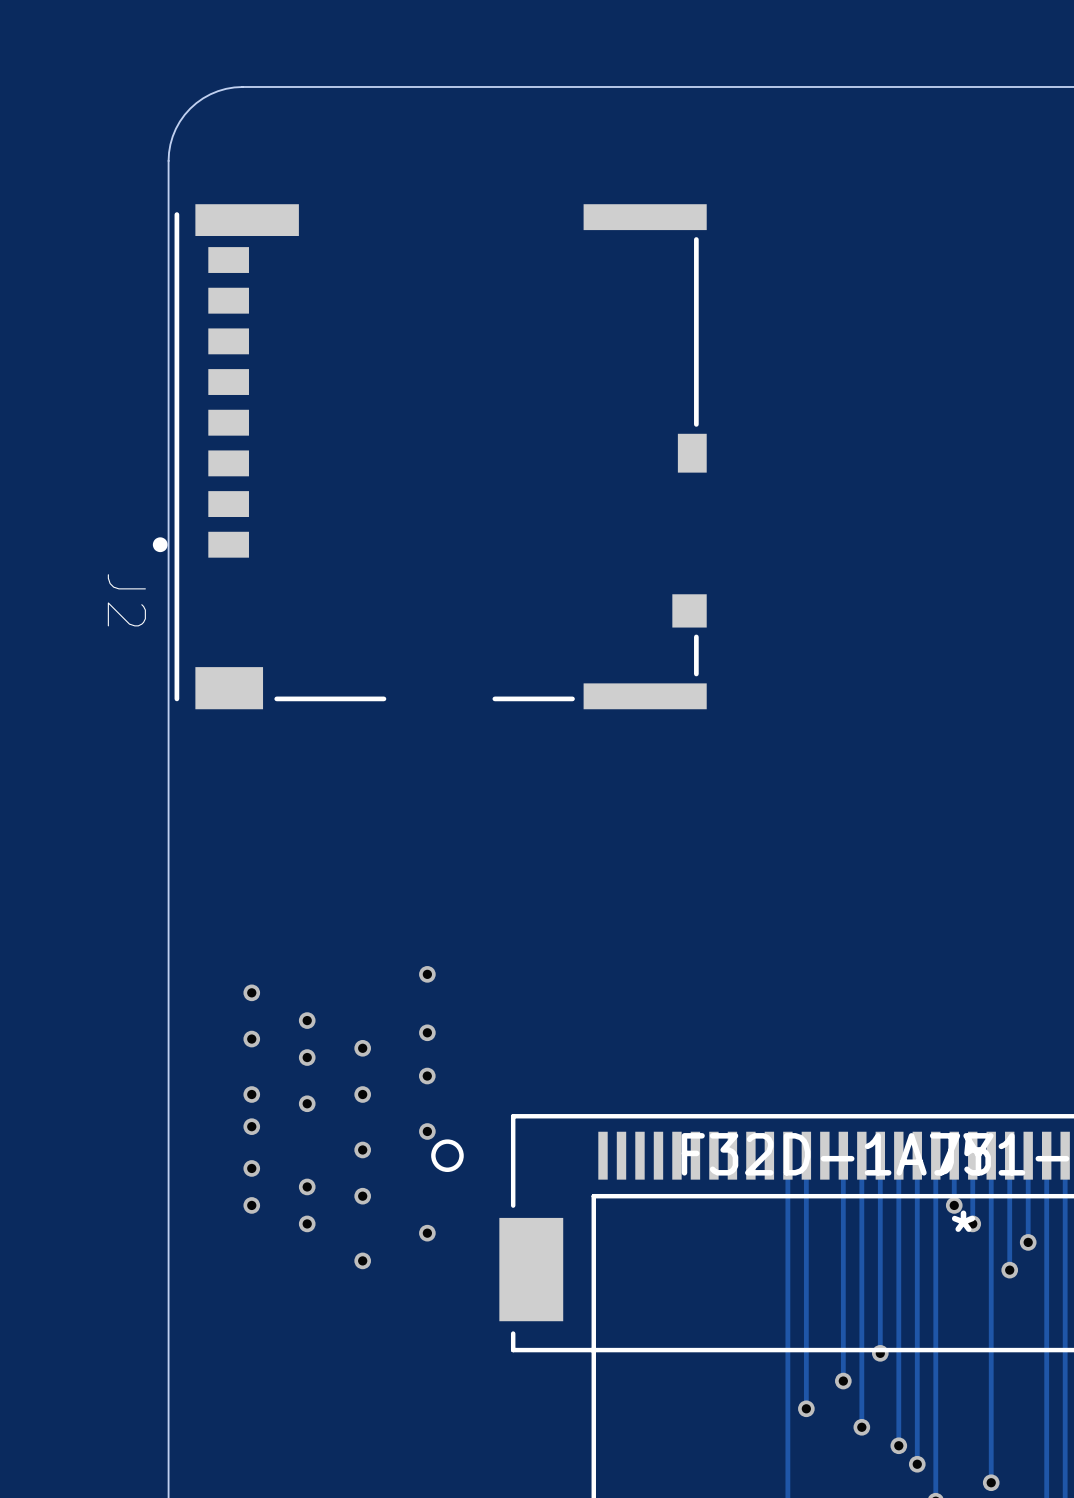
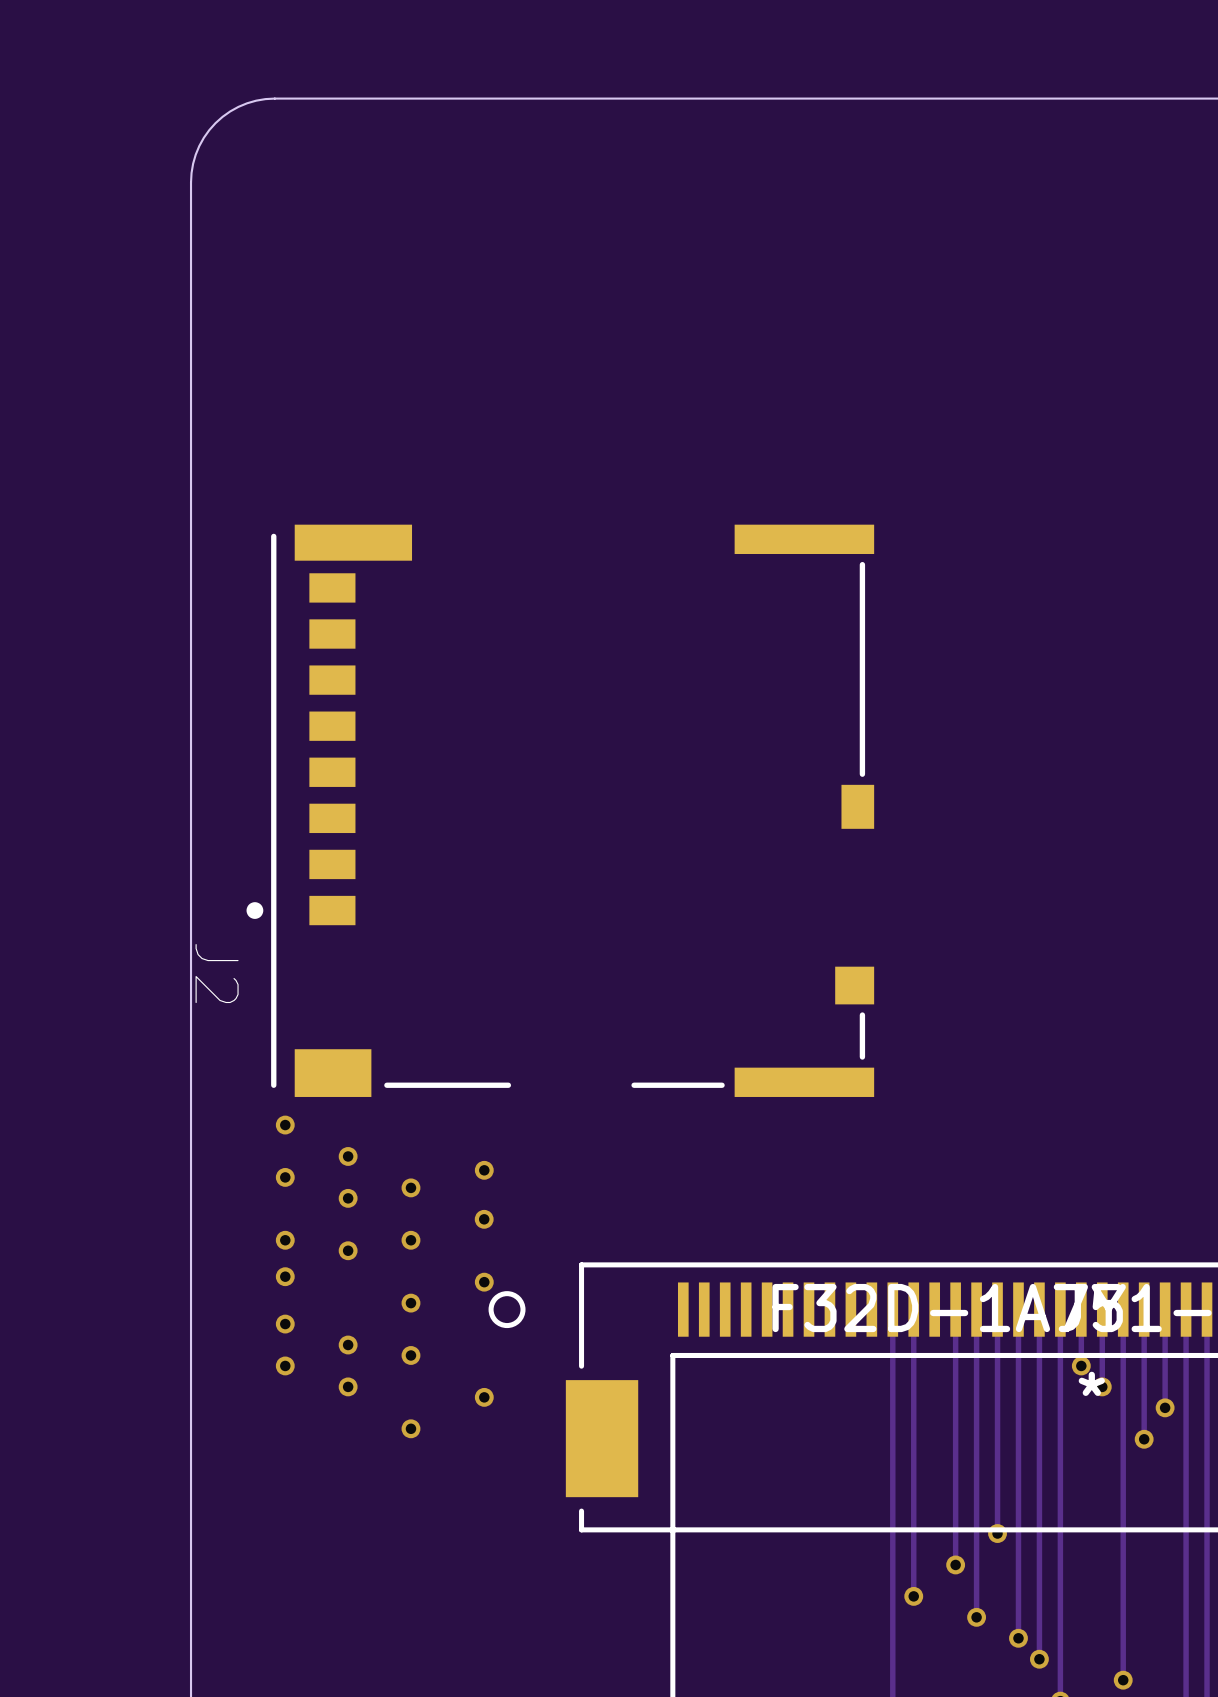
J2 position: (429, 456) -> (560, 810)
via: (427, 974) -> none

